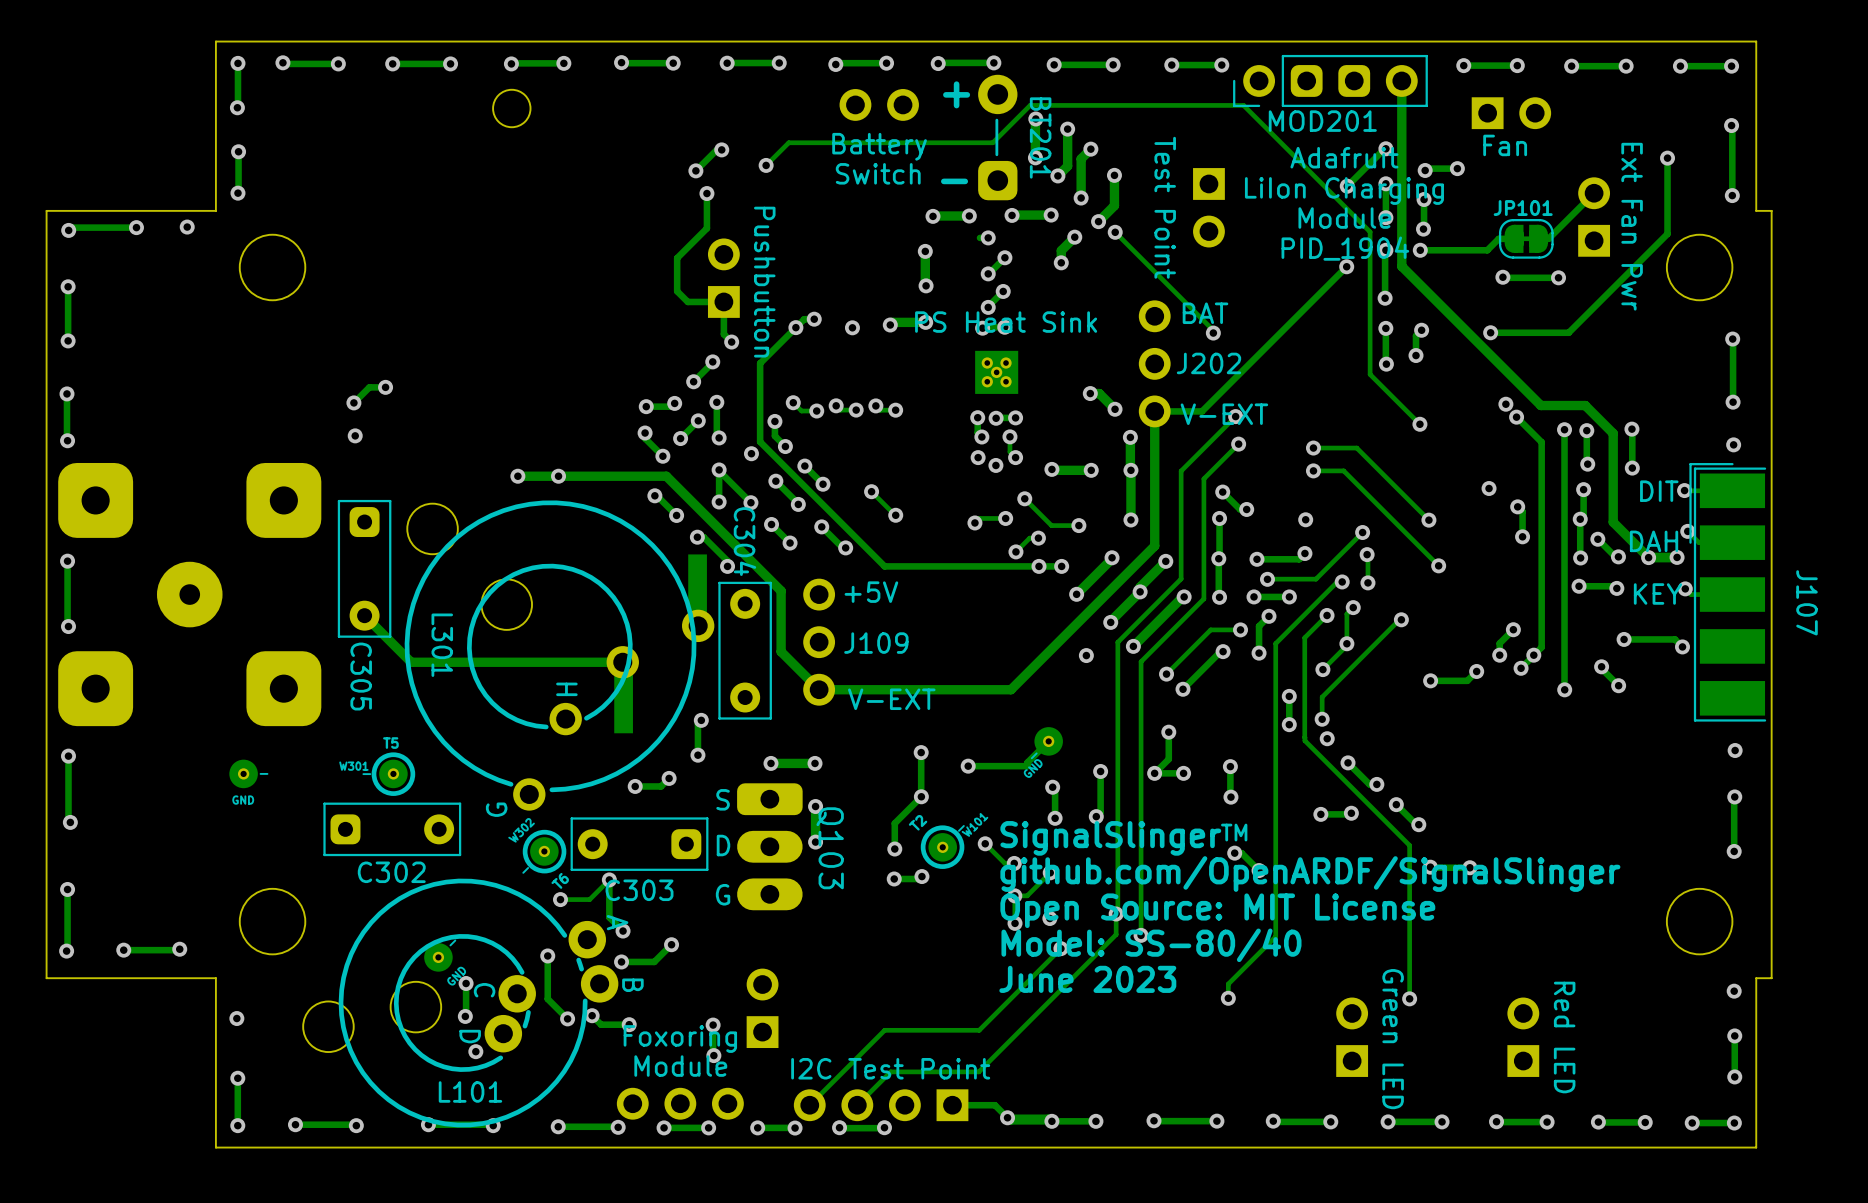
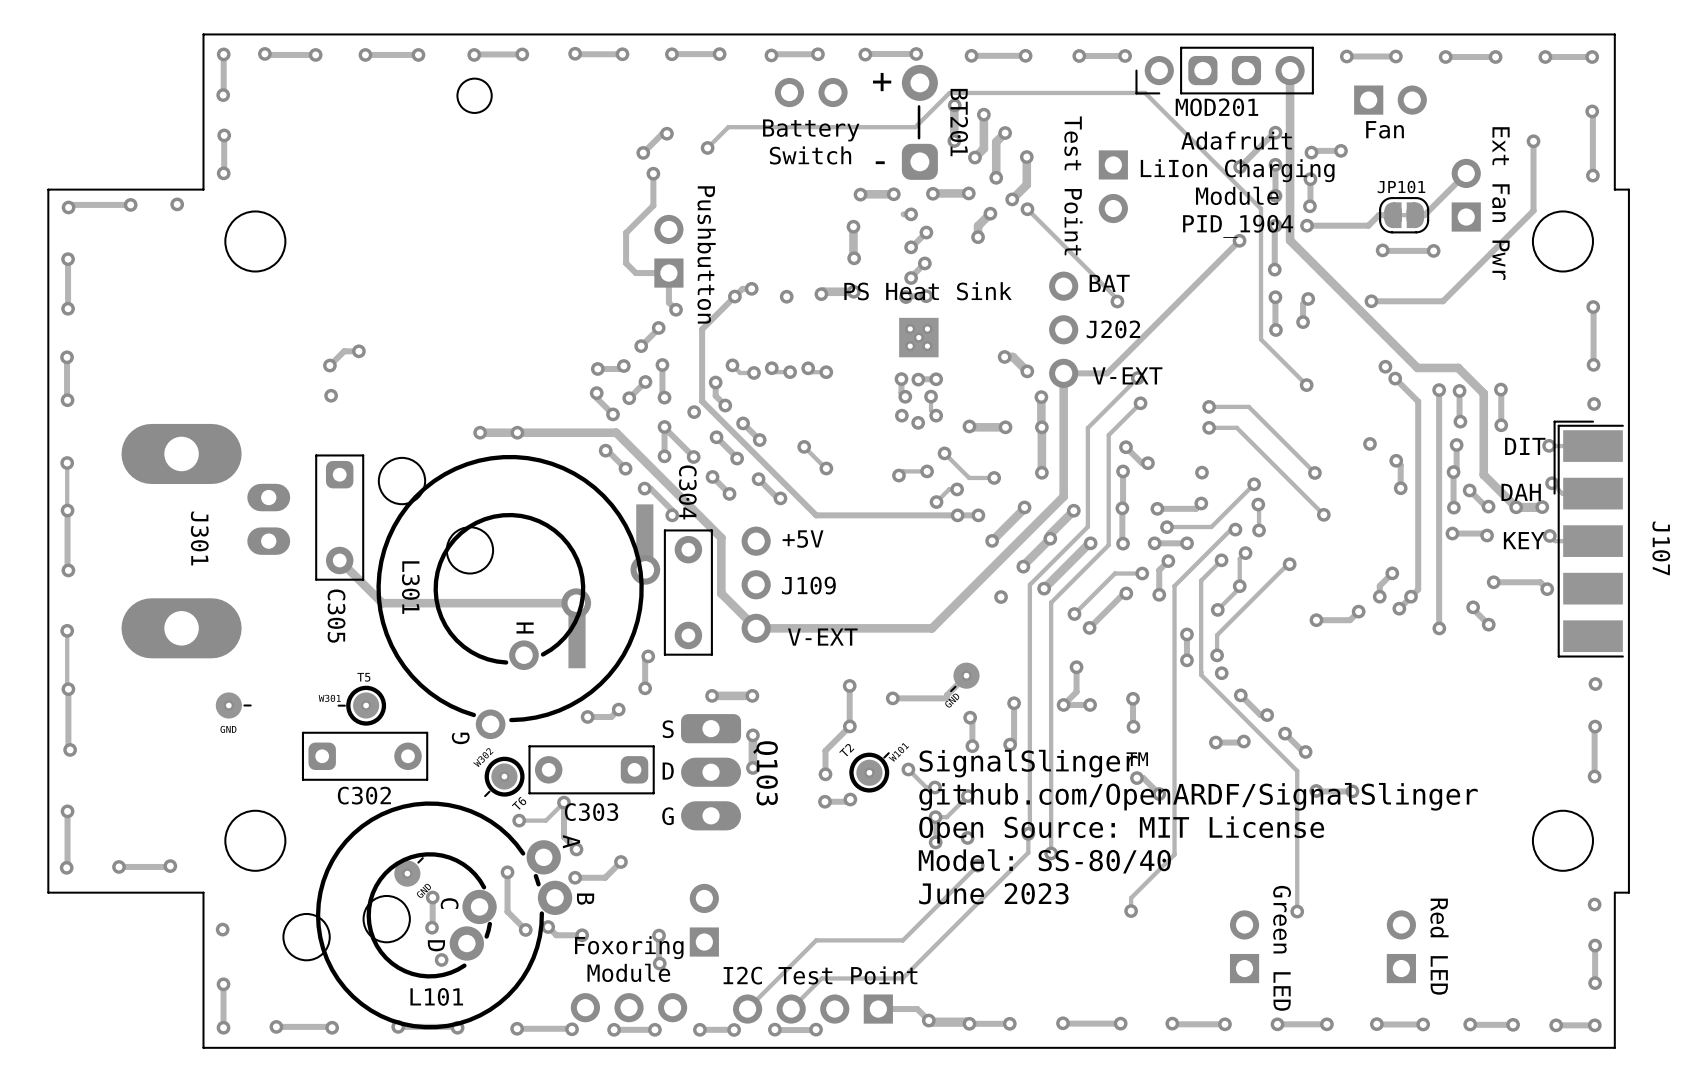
track: none -> (67, 463) (67, 510)
via: none -> (67, 463)
part: (189, 594) -> none
J301: none -> (205, 541)
track: none -> (67, 630) (68, 689)
via: none -> (67, 630)

